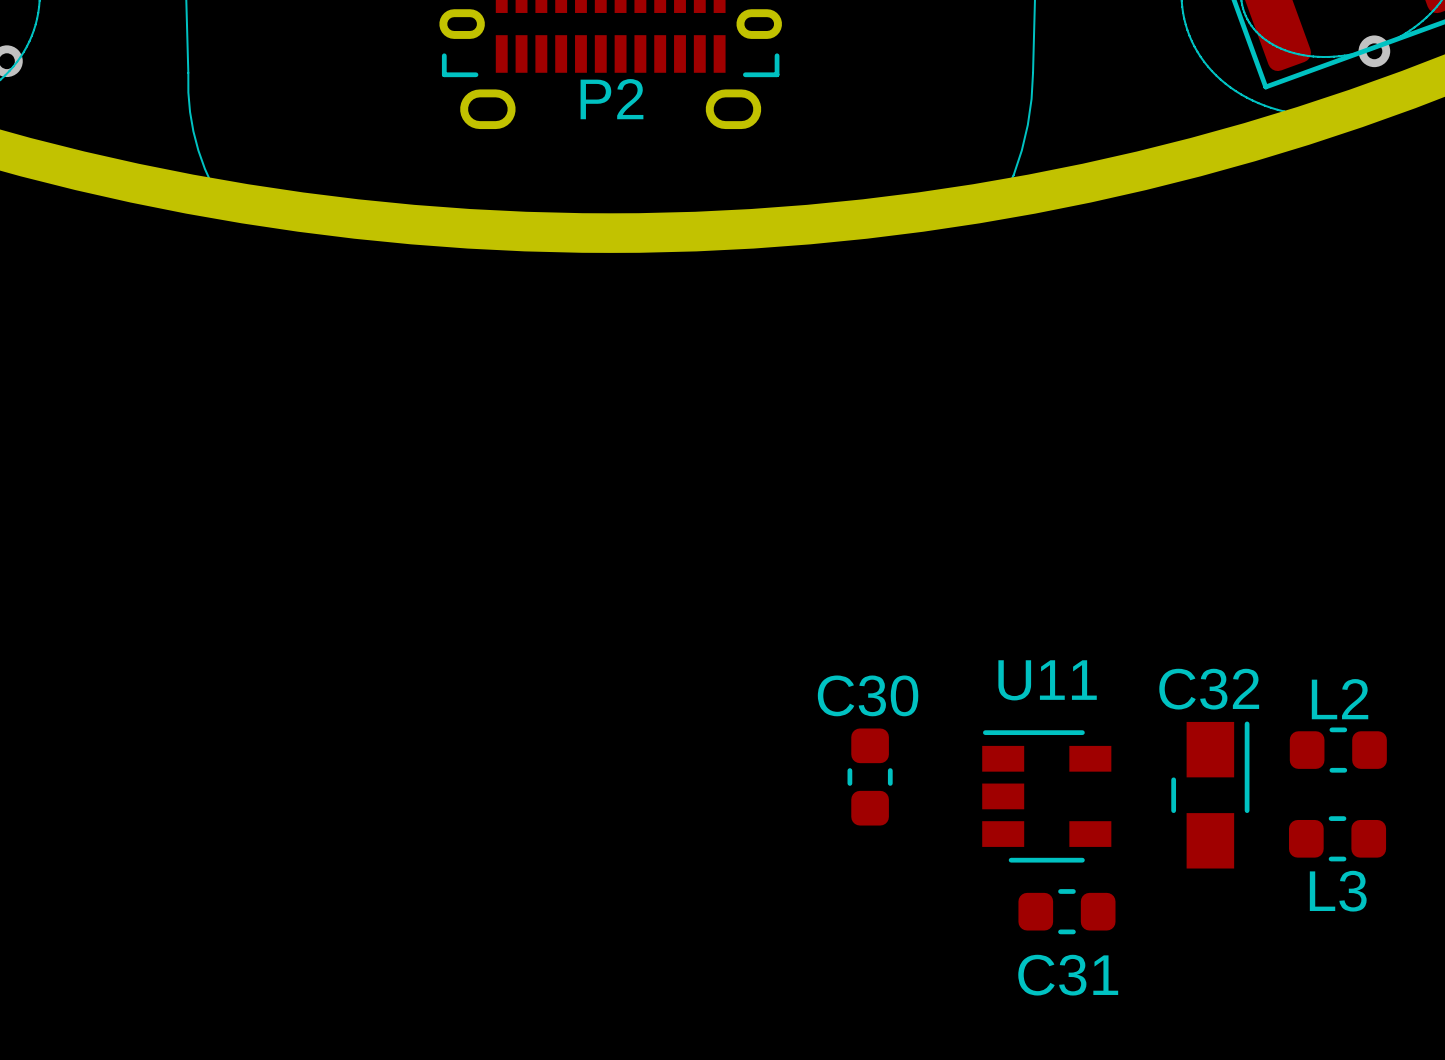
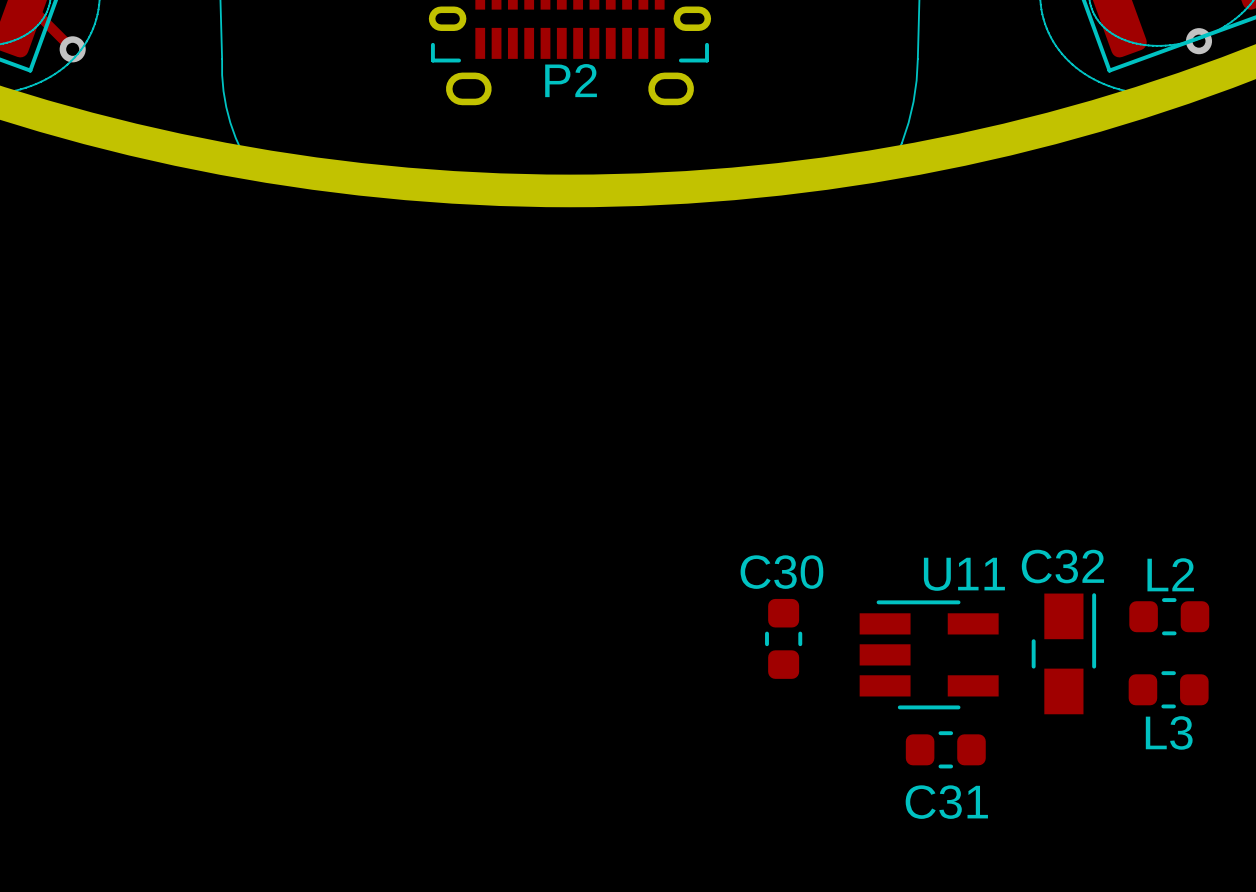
U11 name position: U11 (1047, 680) -> U11 (964, 574)
U11 footprint: [982, 730, 1112, 863] -> [859, 600, 999, 710]

